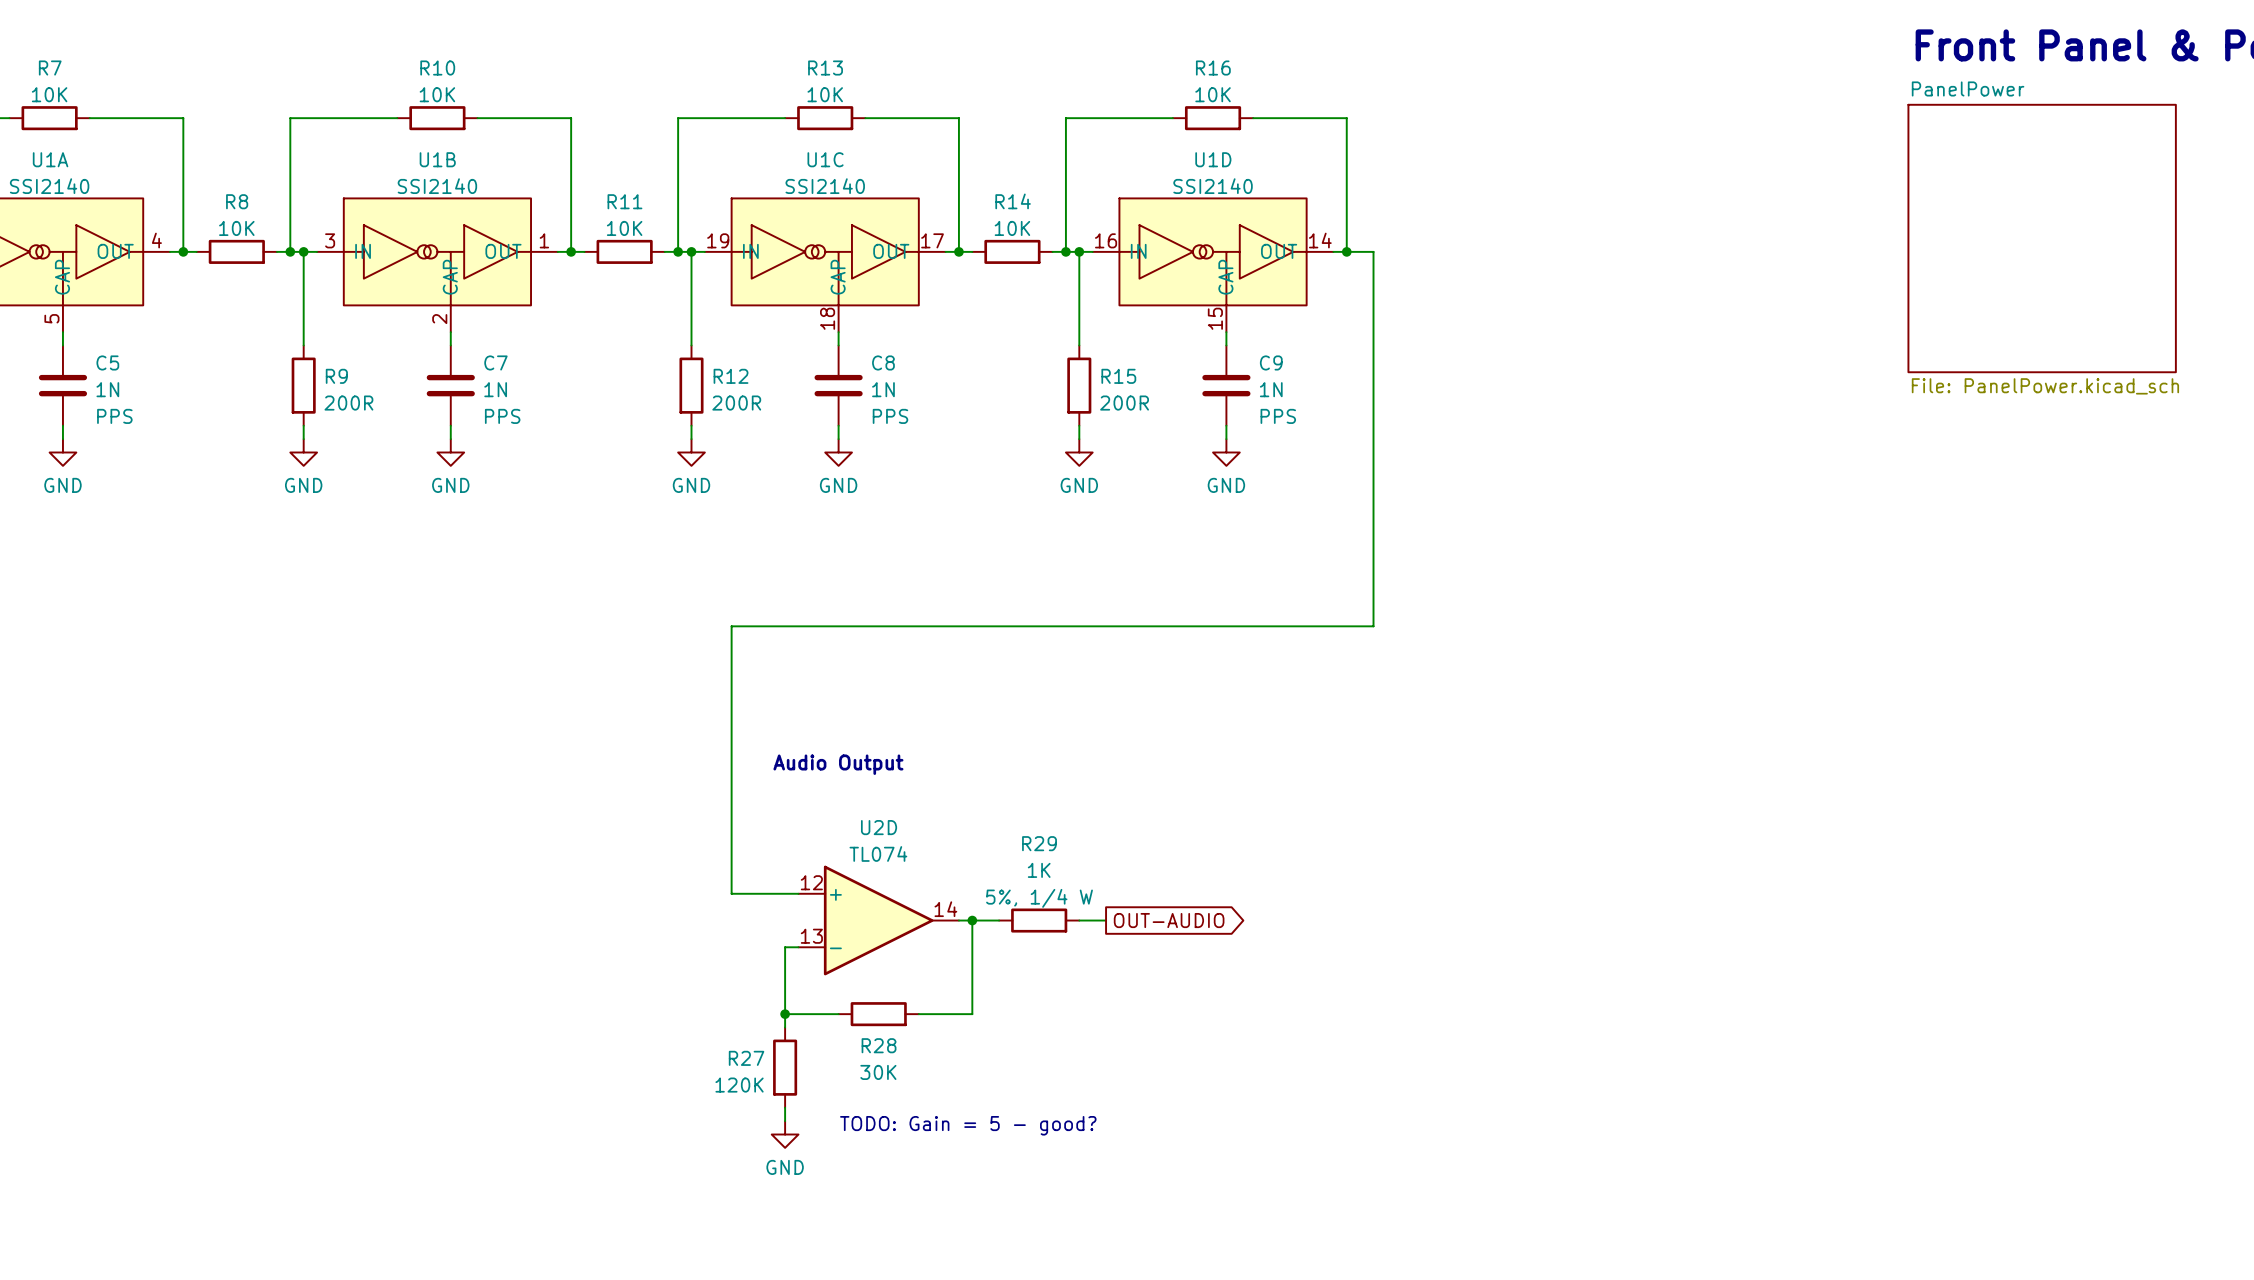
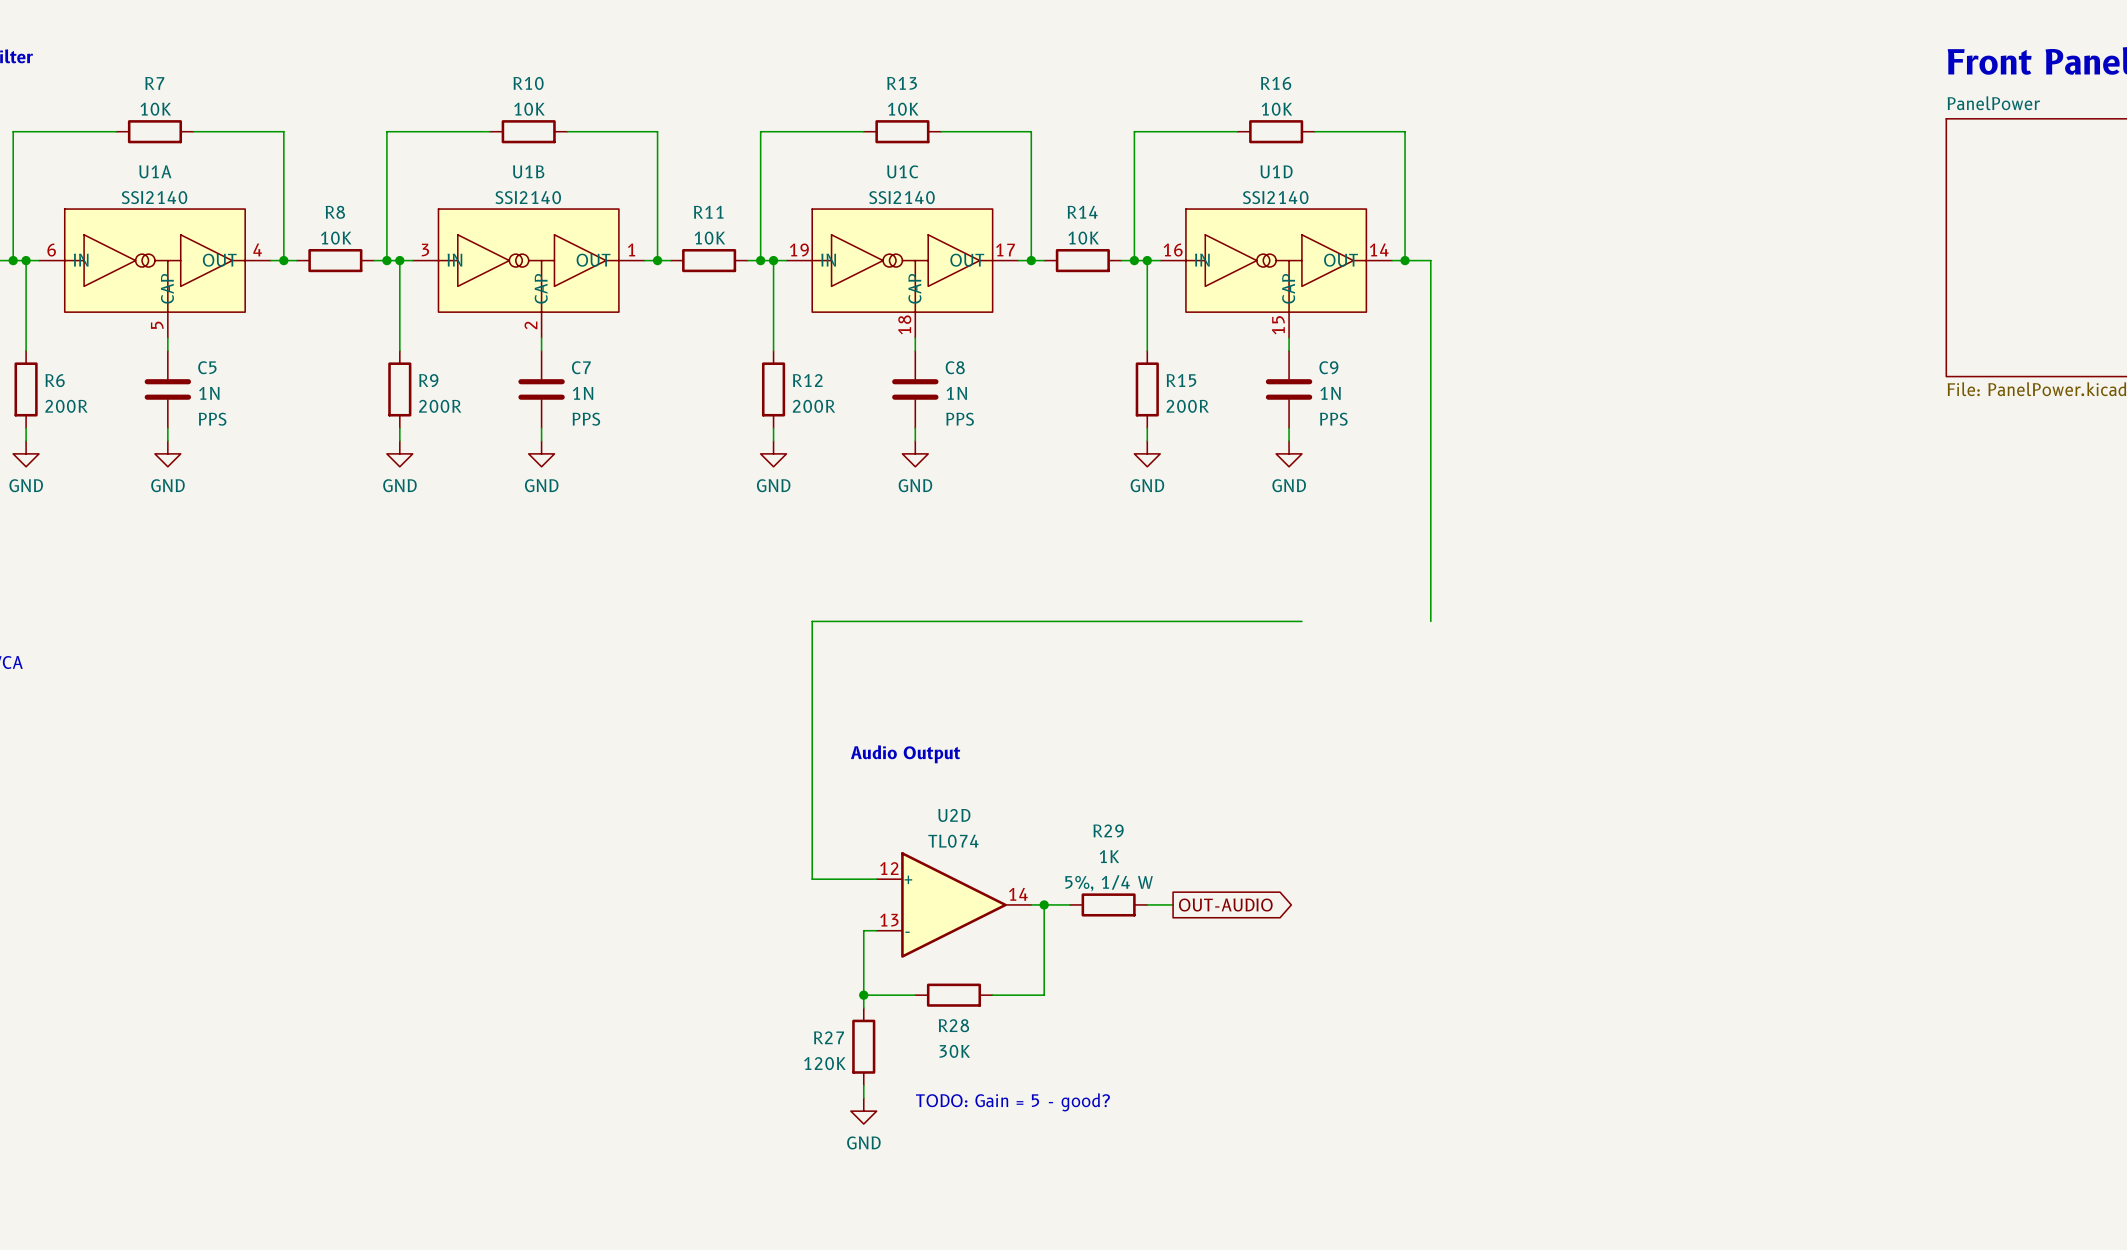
wire: (1239, 626) (1373, 626) -> none

